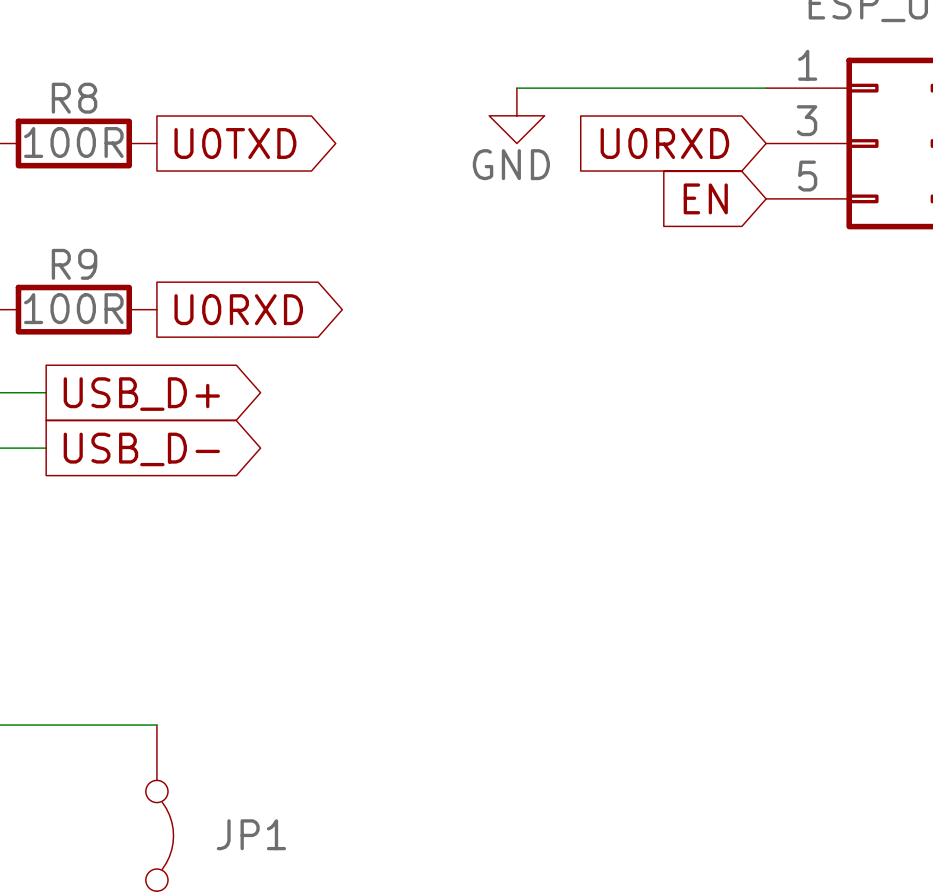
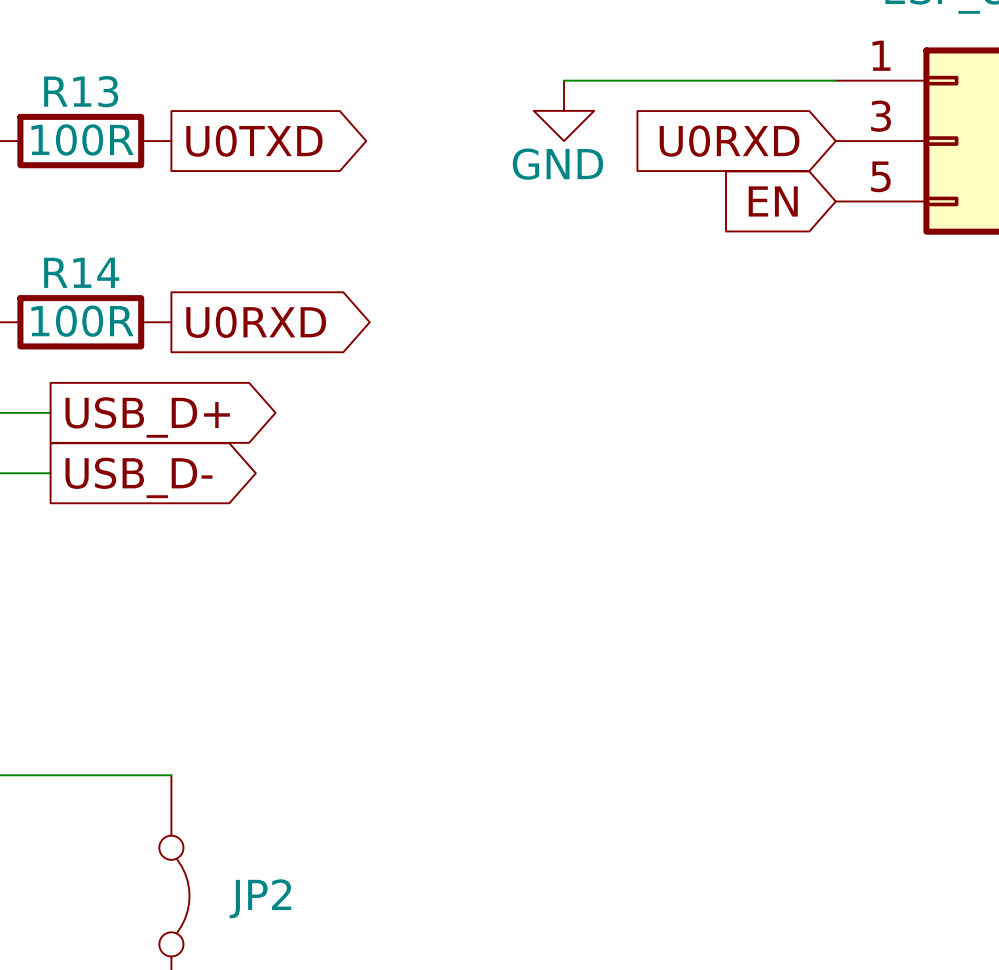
R8 name: R8 (74, 98) -> R13 (81, 91)
R9 name: R9 (74, 264) -> R14 (81, 272)
JP1 name: JP1 (251, 834) -> JP2 (260, 898)

